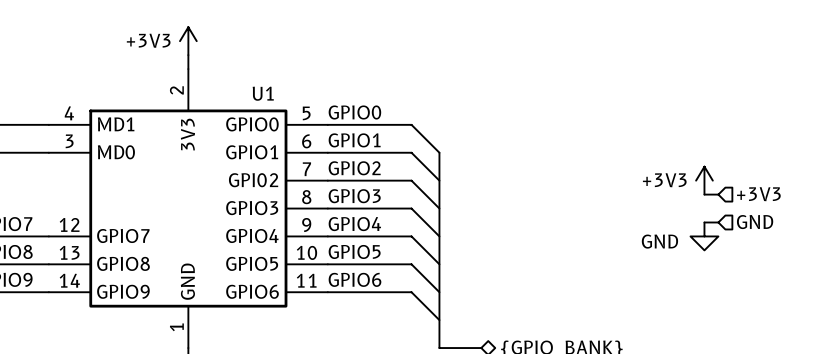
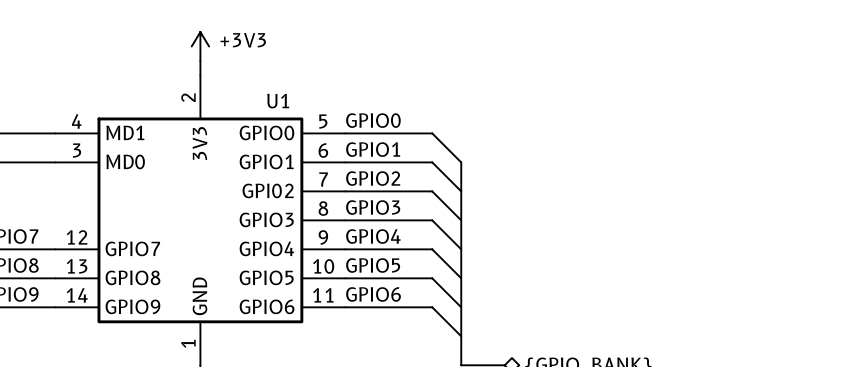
power symbol text position: +3V3 (148, 40) -> +3V3 (243, 40)
power symbol: +3V3 (704, 180) -> none
wire: (704, 194) (718, 194) -> none
hierarchical label: +3V3 (758, 194) -> none
wire: (704, 222) (718, 222) -> none
hierarchical label: GND (755, 222) -> none
power symbol: GND (704, 236) -> none

